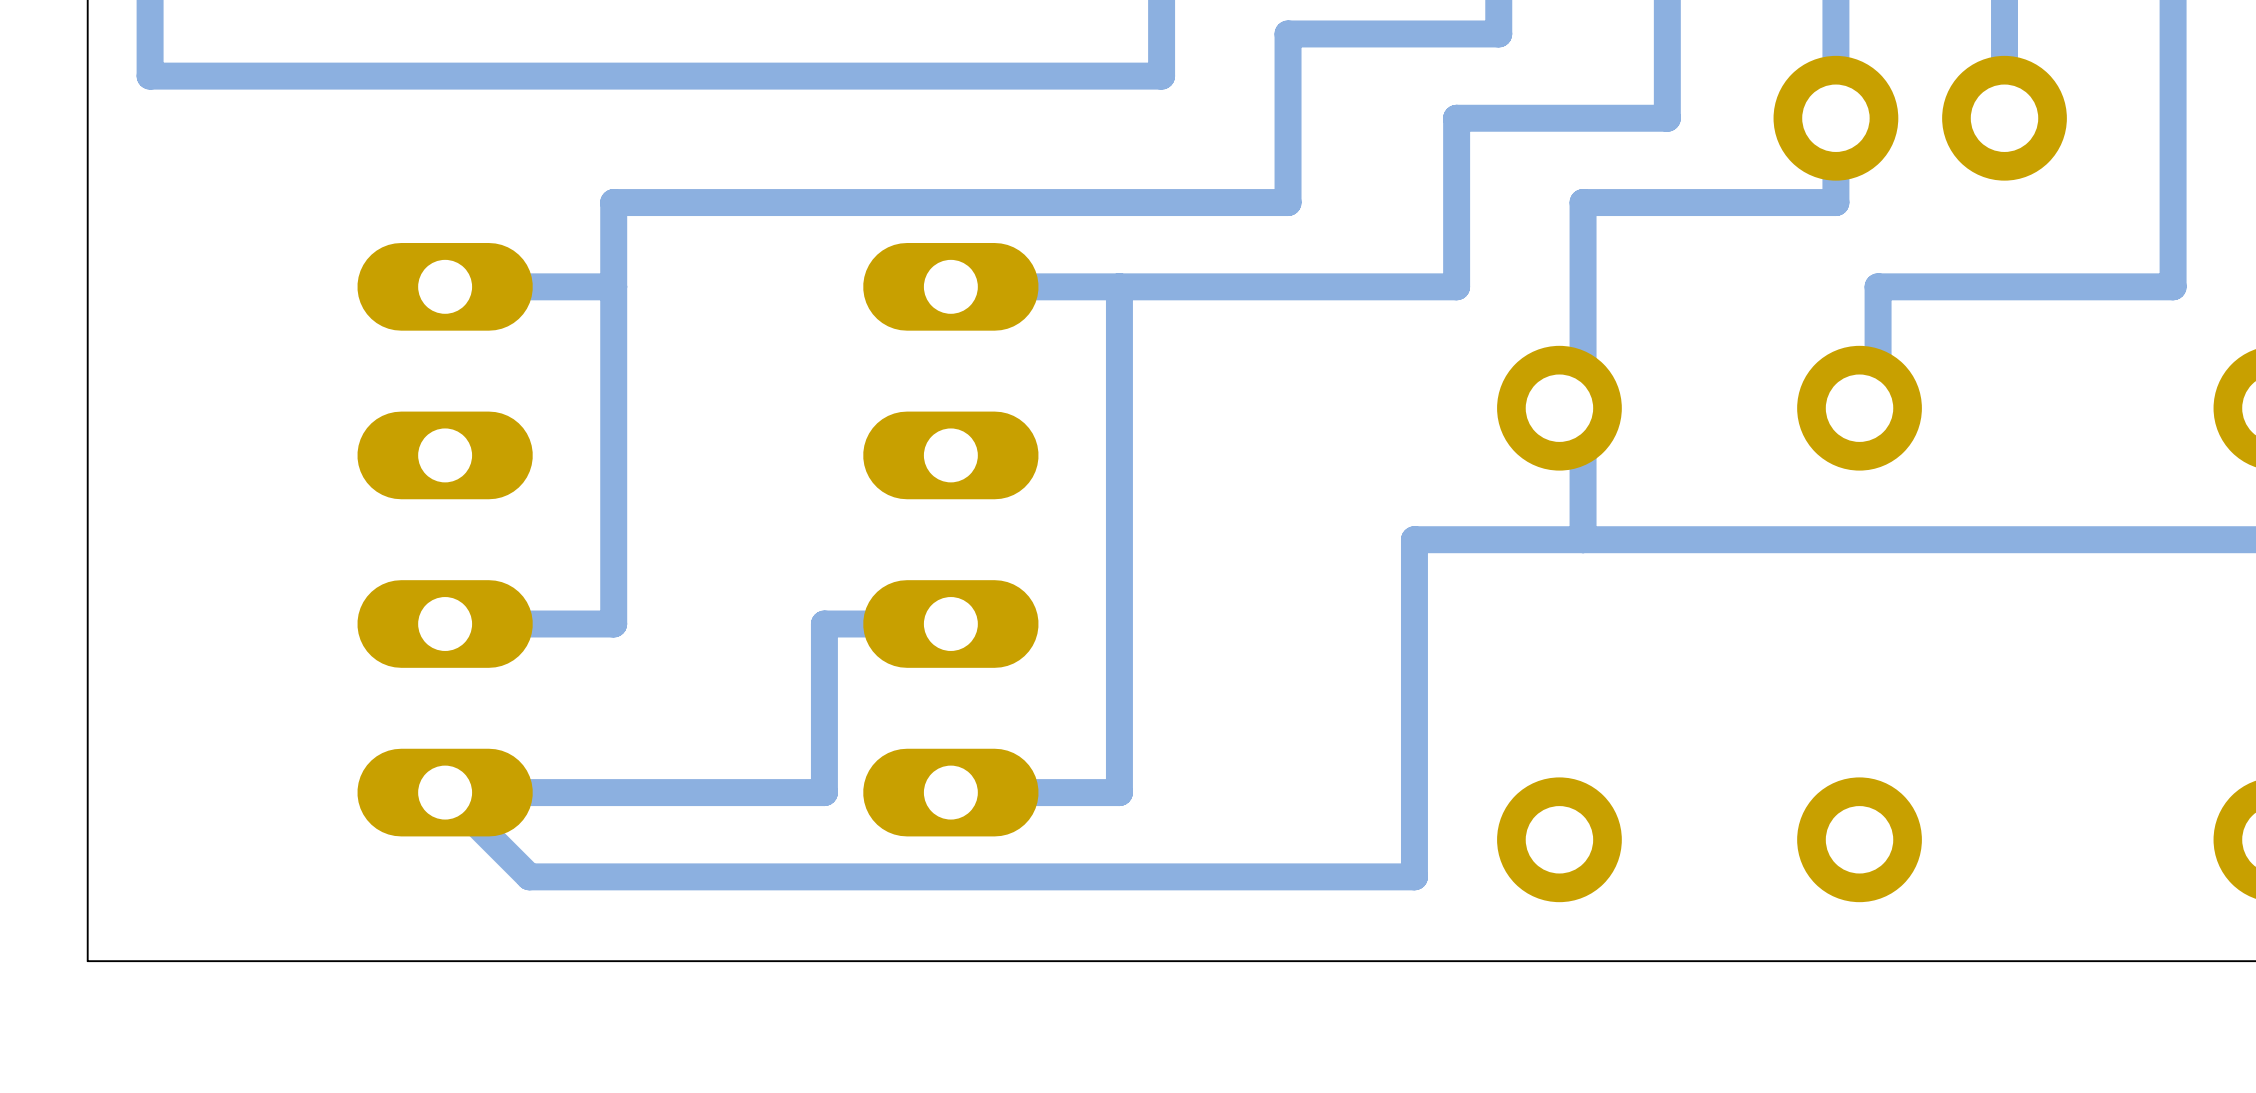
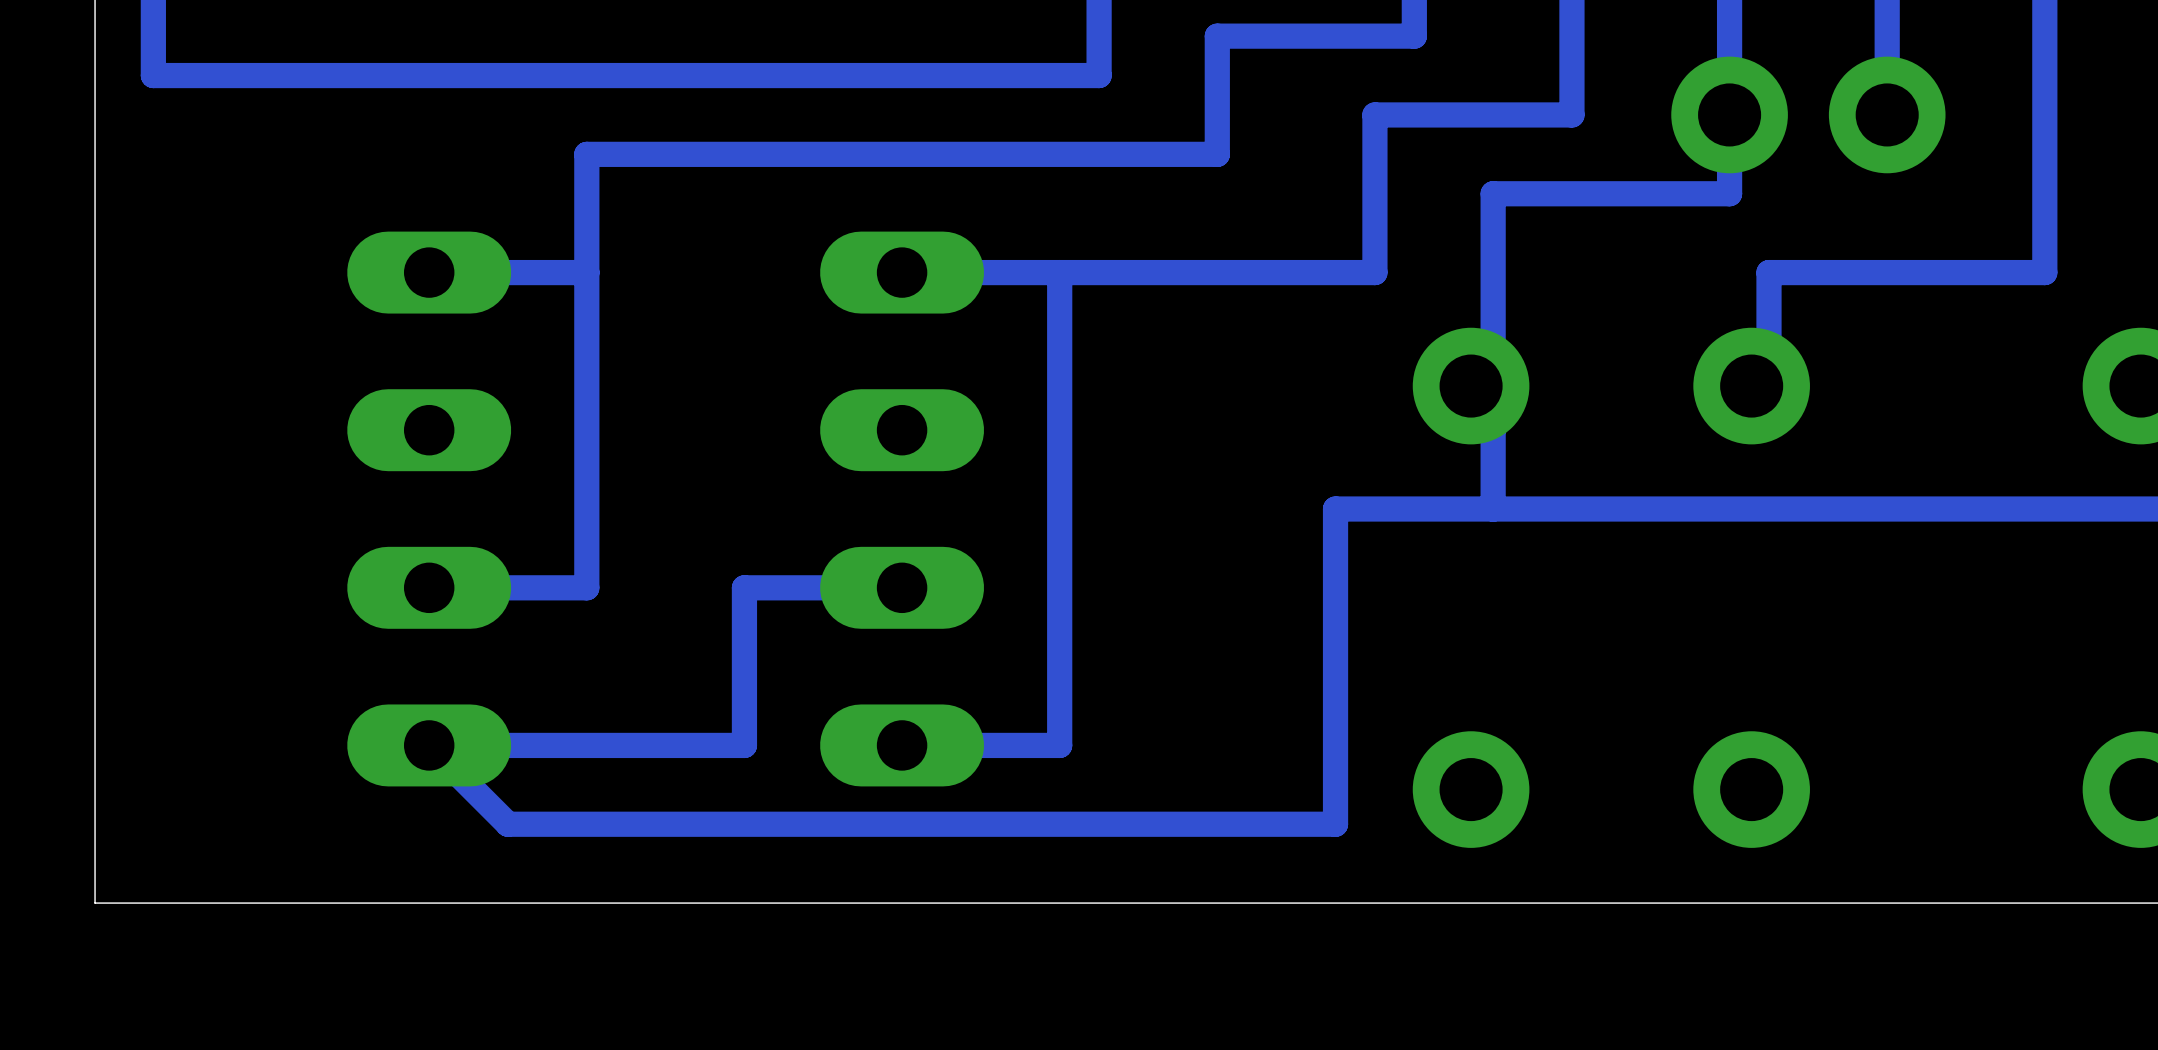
bottom track: (1288, 160) (1288, 202) (613, 202) -> (1217, 154) (586, 154) (586, 193)
bottom track: (824, 624) (824, 792) (782, 792) -> (783, 587) (744, 587) (744, 745)

